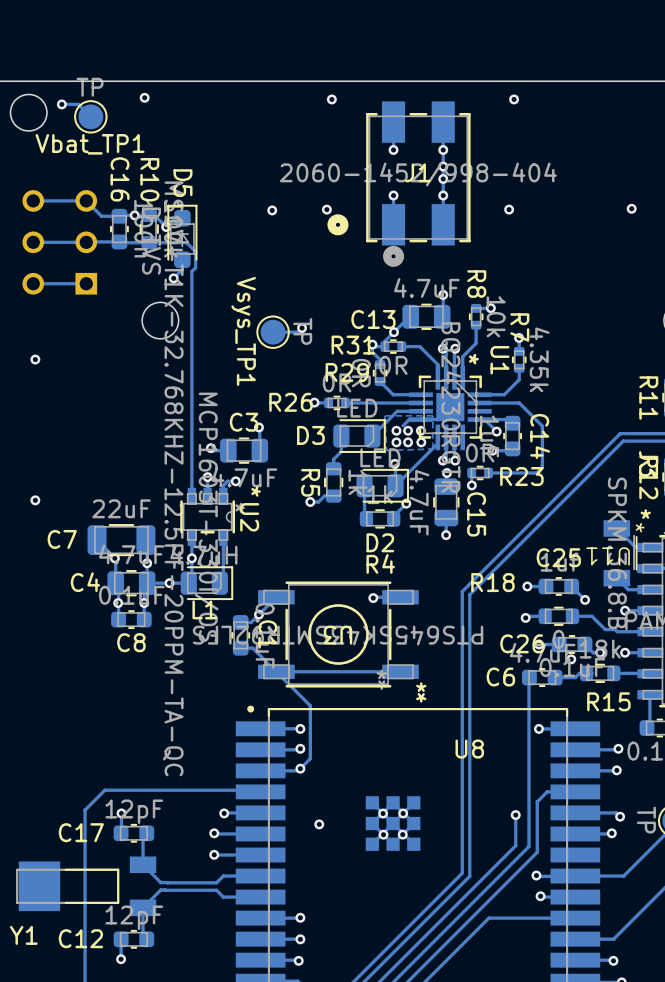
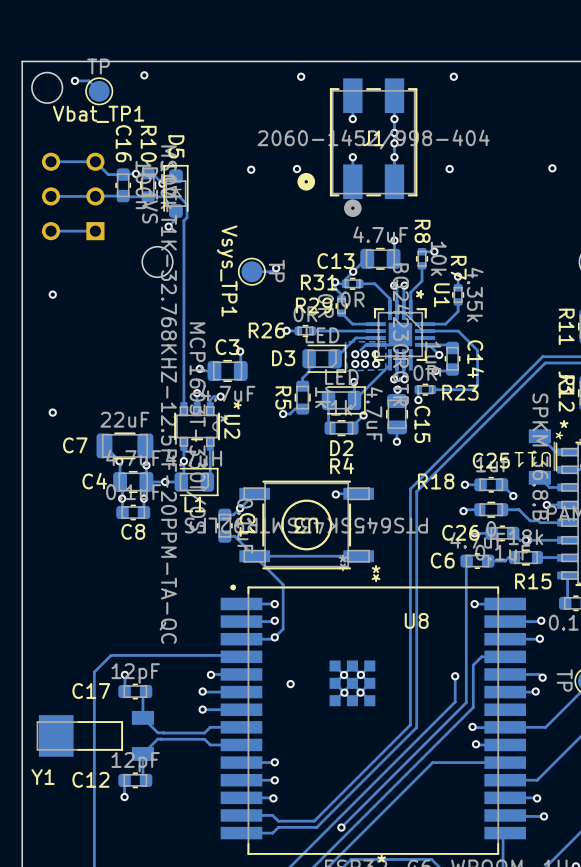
track: none -> (546, 540) (525, 540)
via: (625, 652) -> none
via: (571, 659) -> none

